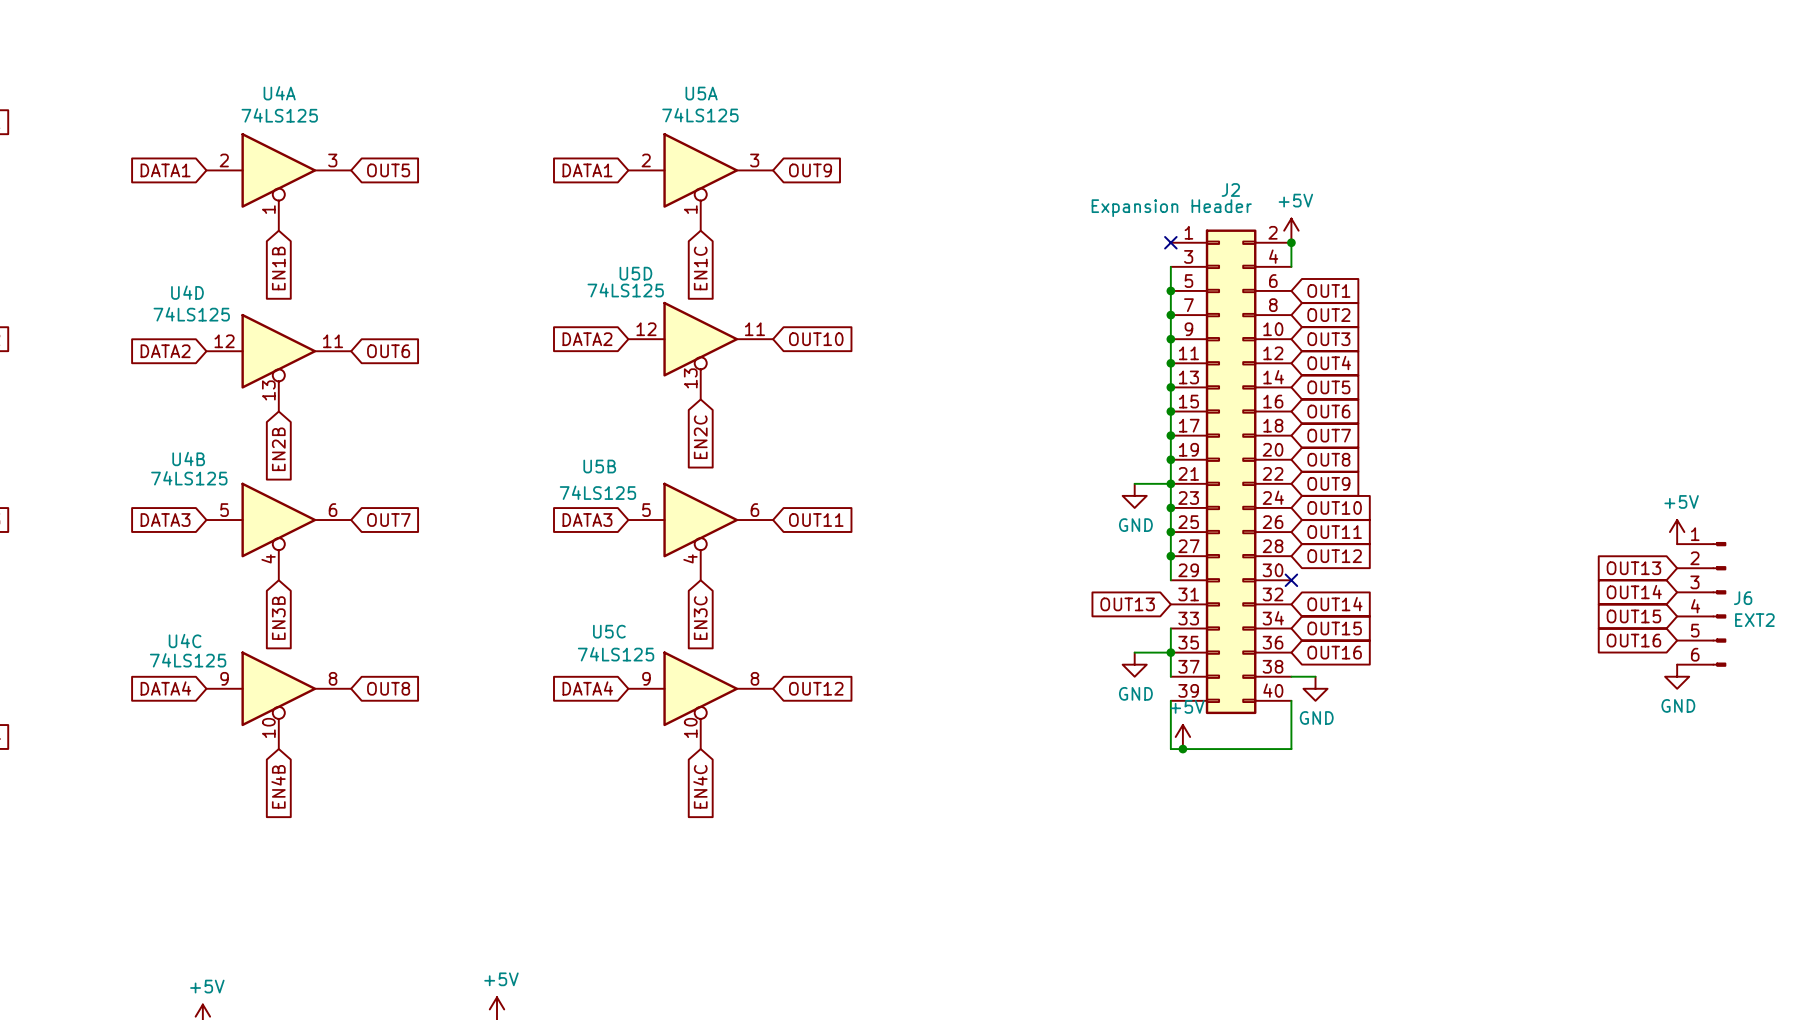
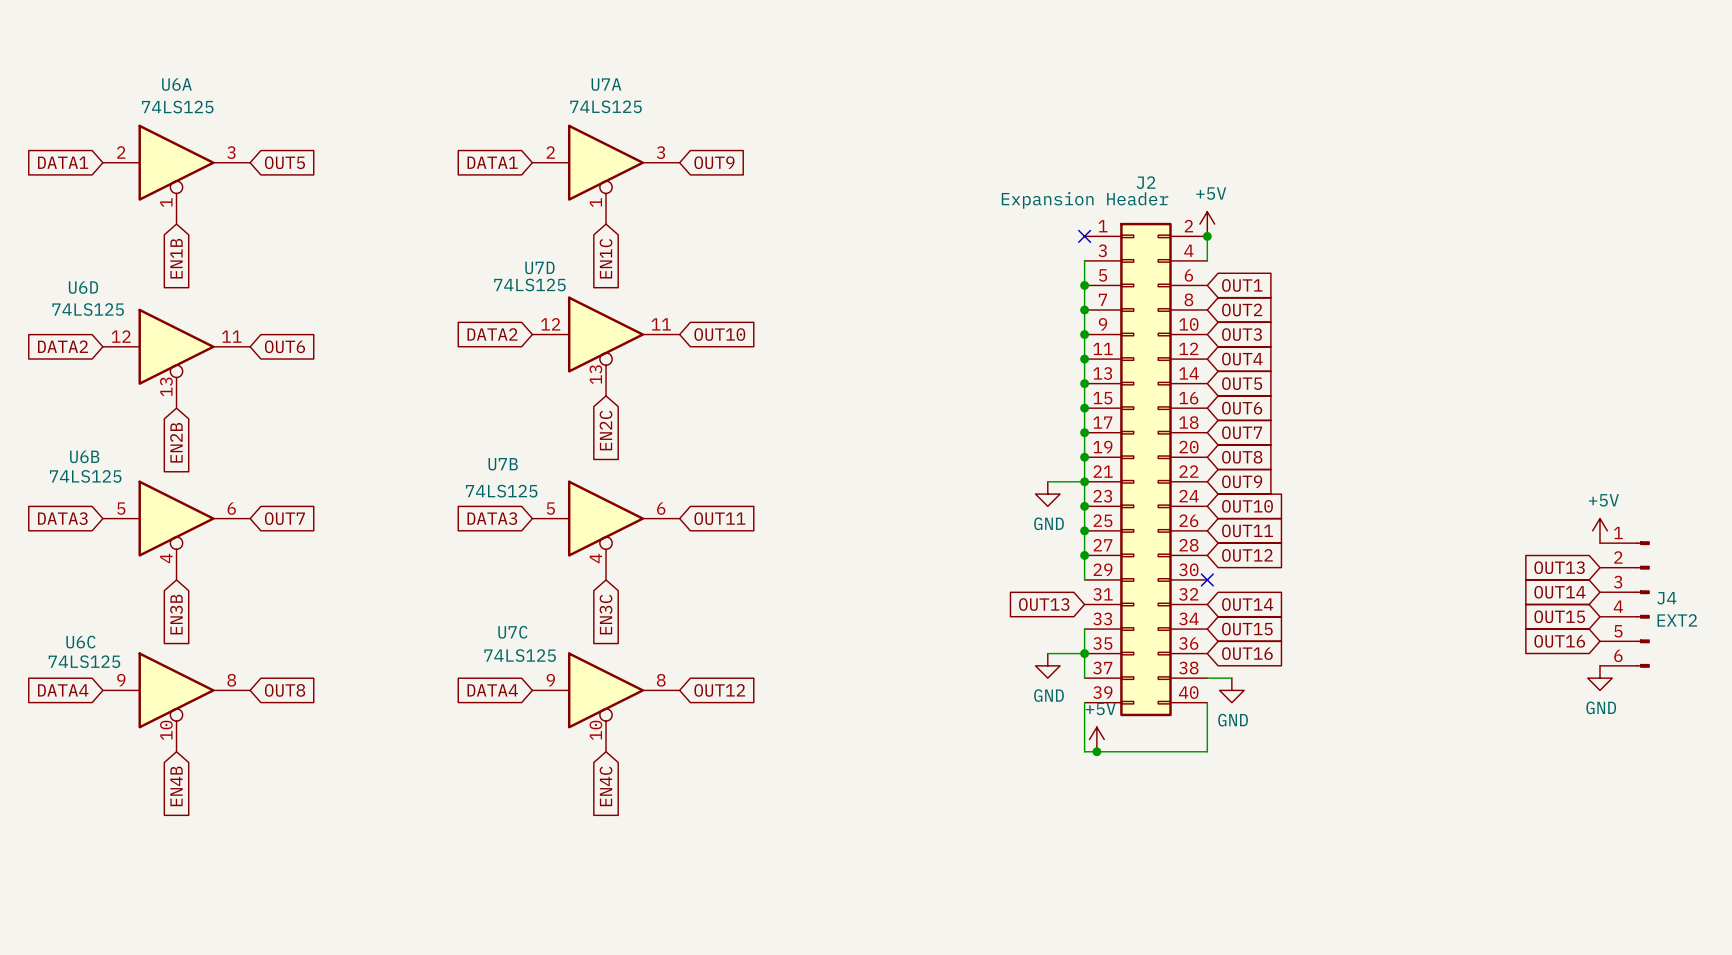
U4A name: U4A (279, 93) -> U6A (176, 84)
U5A name: U5A (701, 93) -> U7A (606, 84)
U5D name: U5D (635, 273) -> U7D (539, 267)
U4D name: U4D (187, 292) -> U6D (83, 287)
U4B name: U4B (188, 459) -> U6B (84, 456)
U5B name: U5B (599, 466) -> U7B (503, 464)
J6 name: J6 (1743, 598) -> J4 (1666, 598)
U5C name: U5C (609, 631) -> U7C (512, 632)
U4C name: U4C (185, 641) -> U6C (80, 642)

